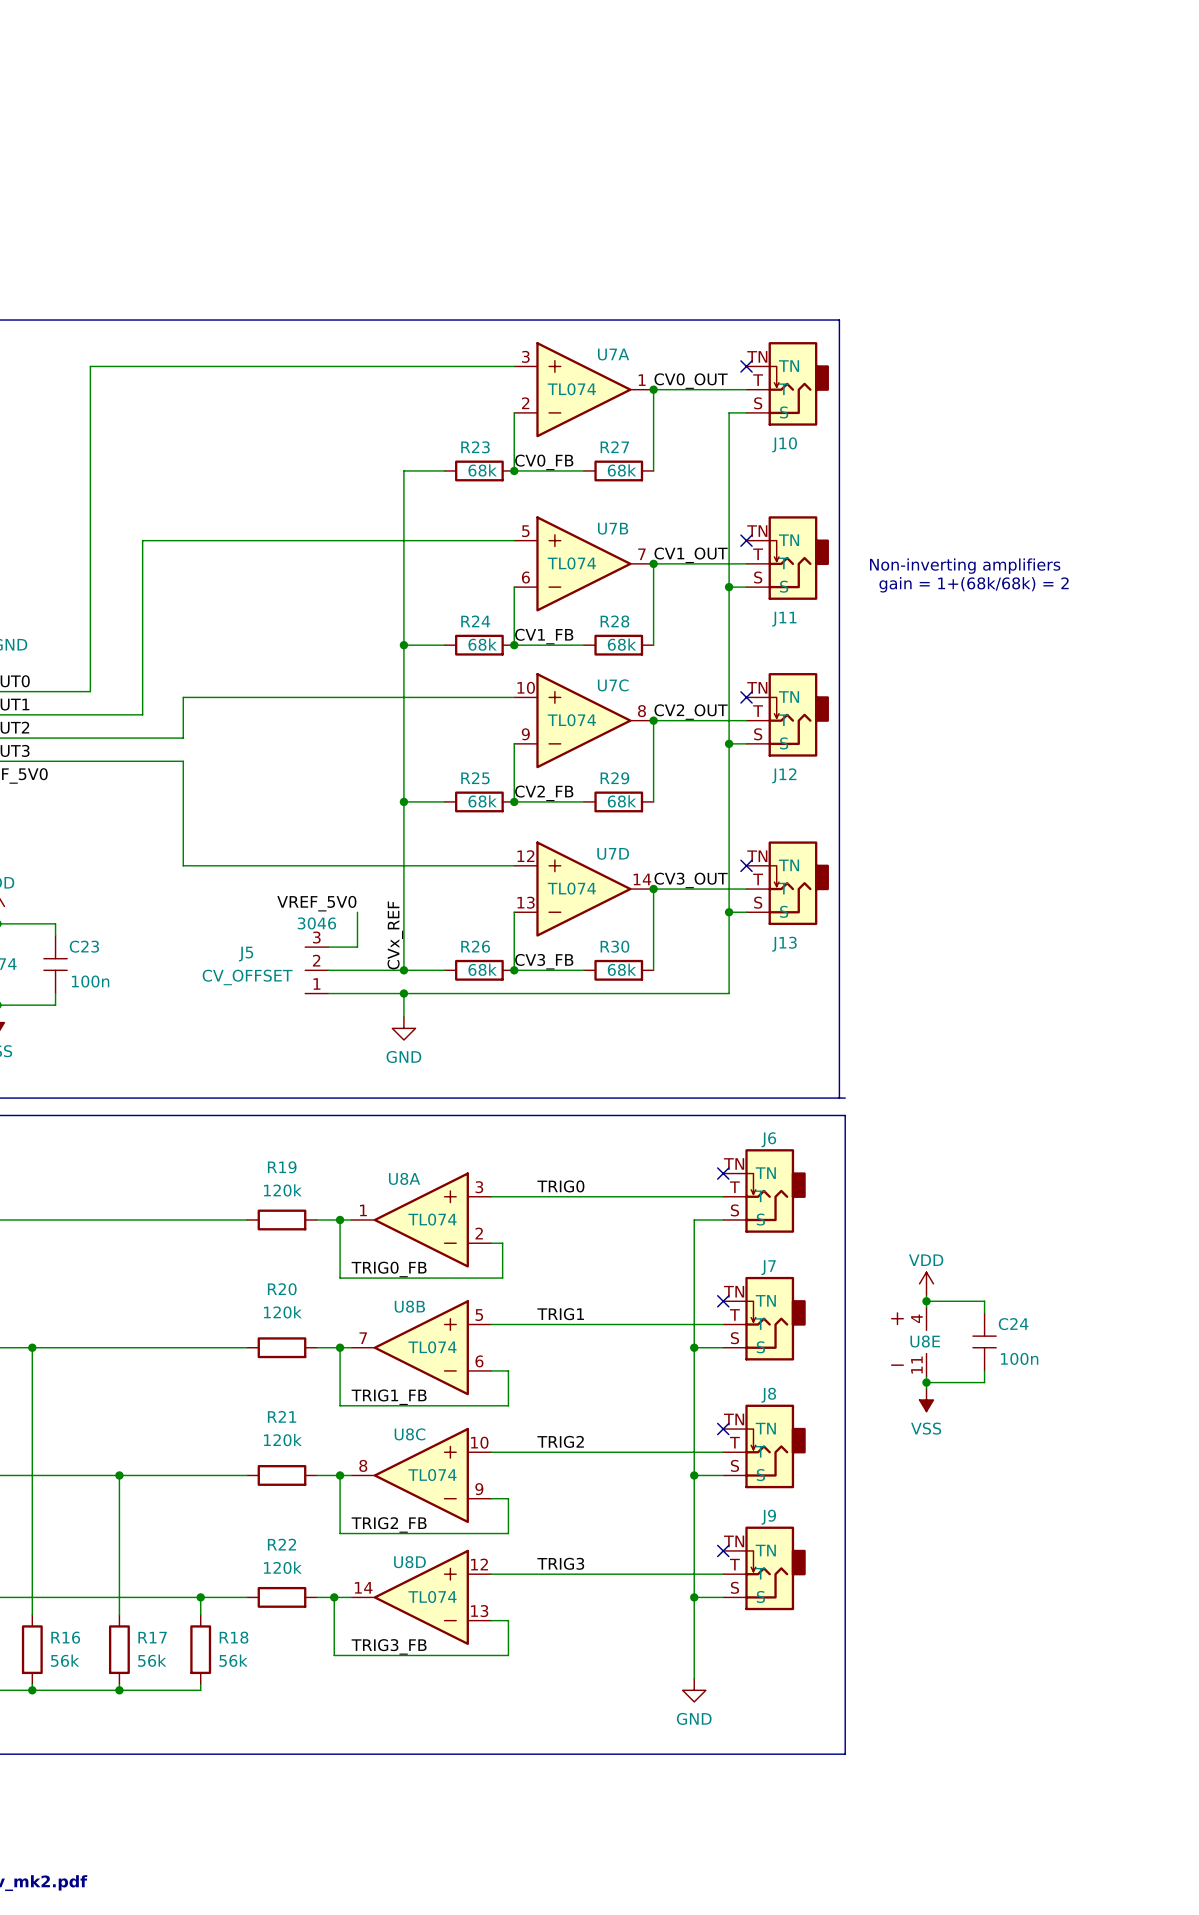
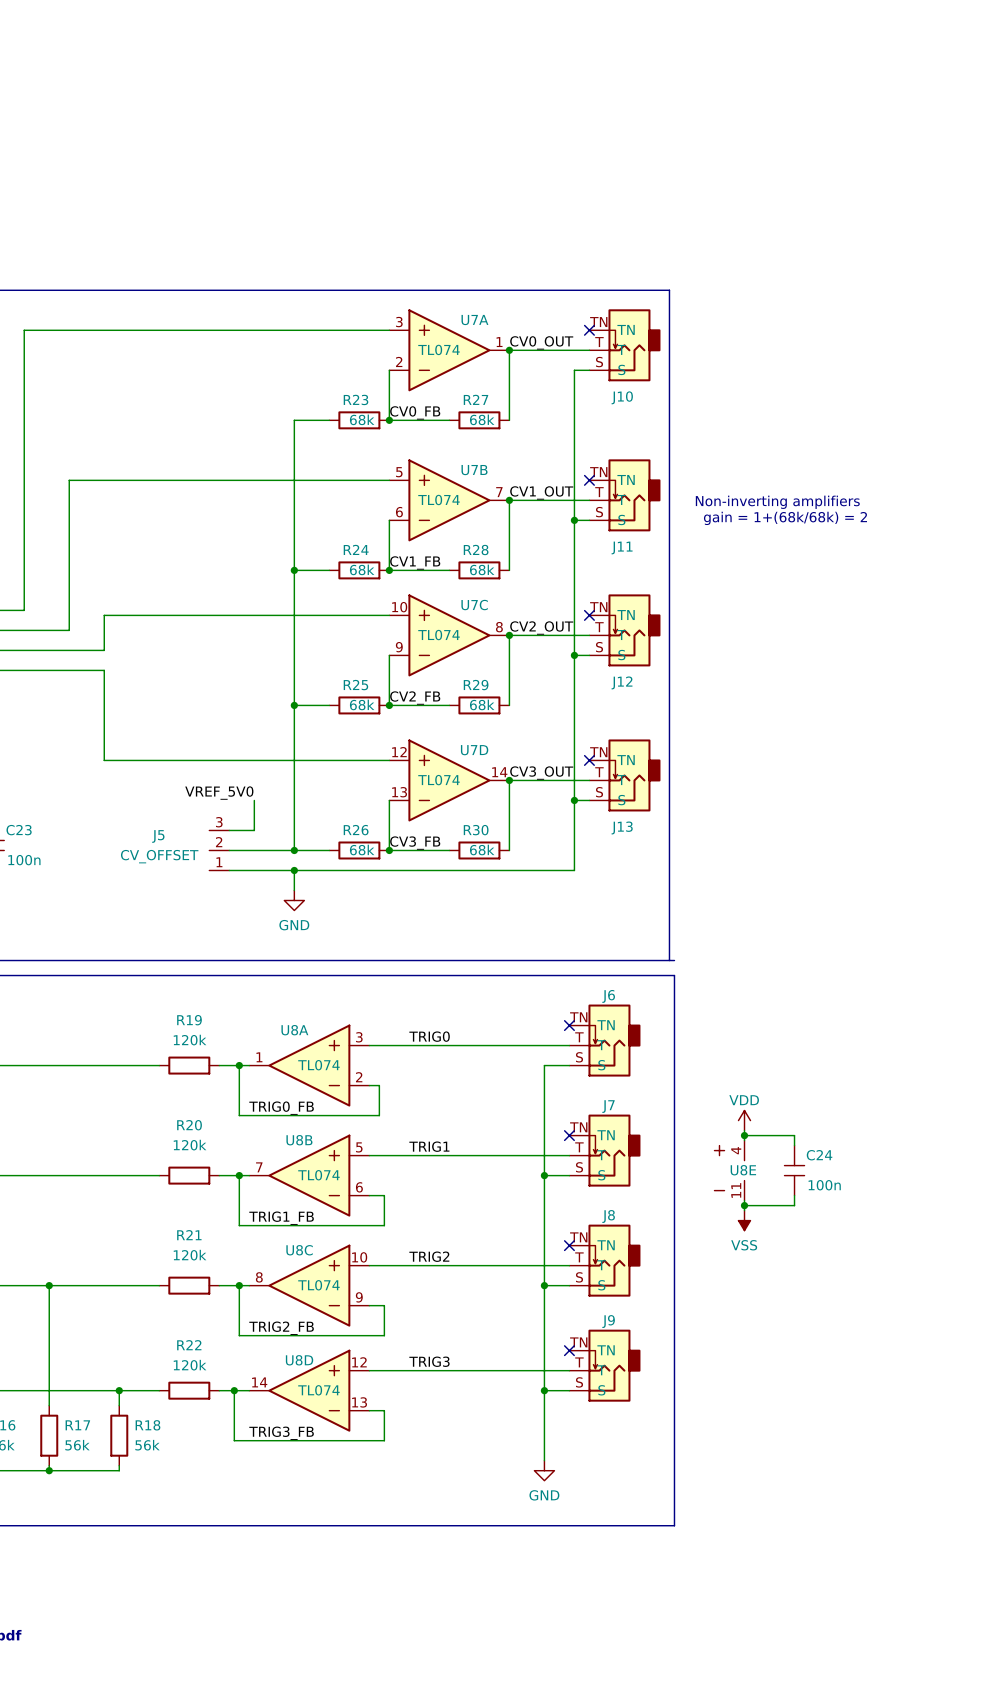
J5 text: 3046 (316, 923) -> none
label: CVx_REF (395, 935) -> none

